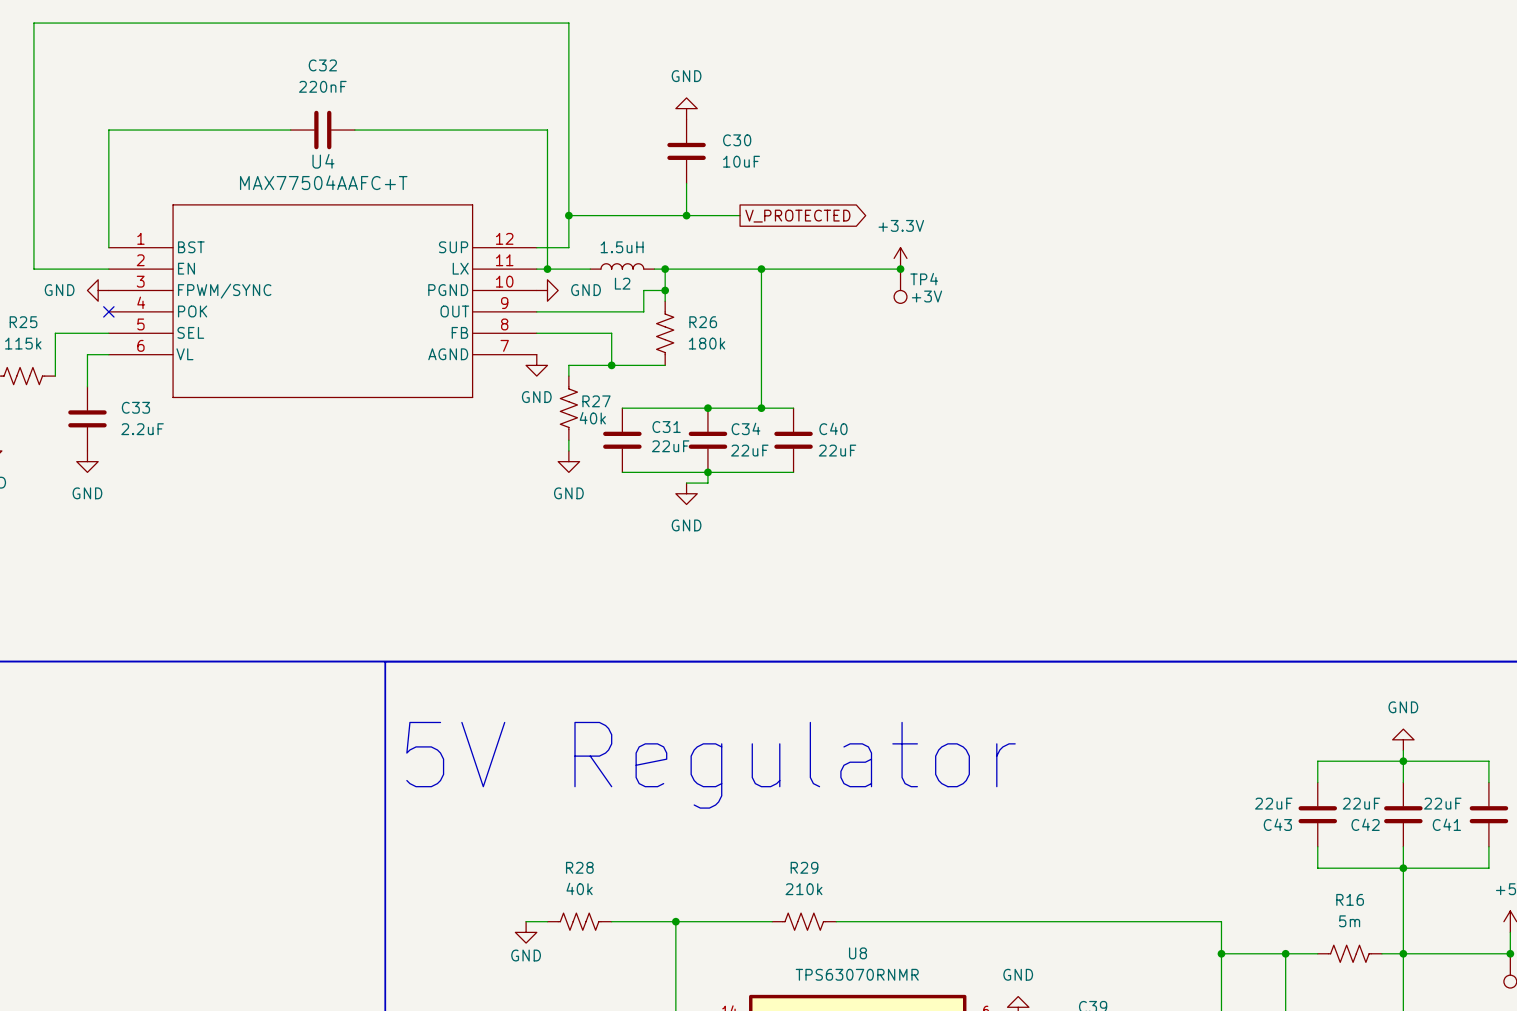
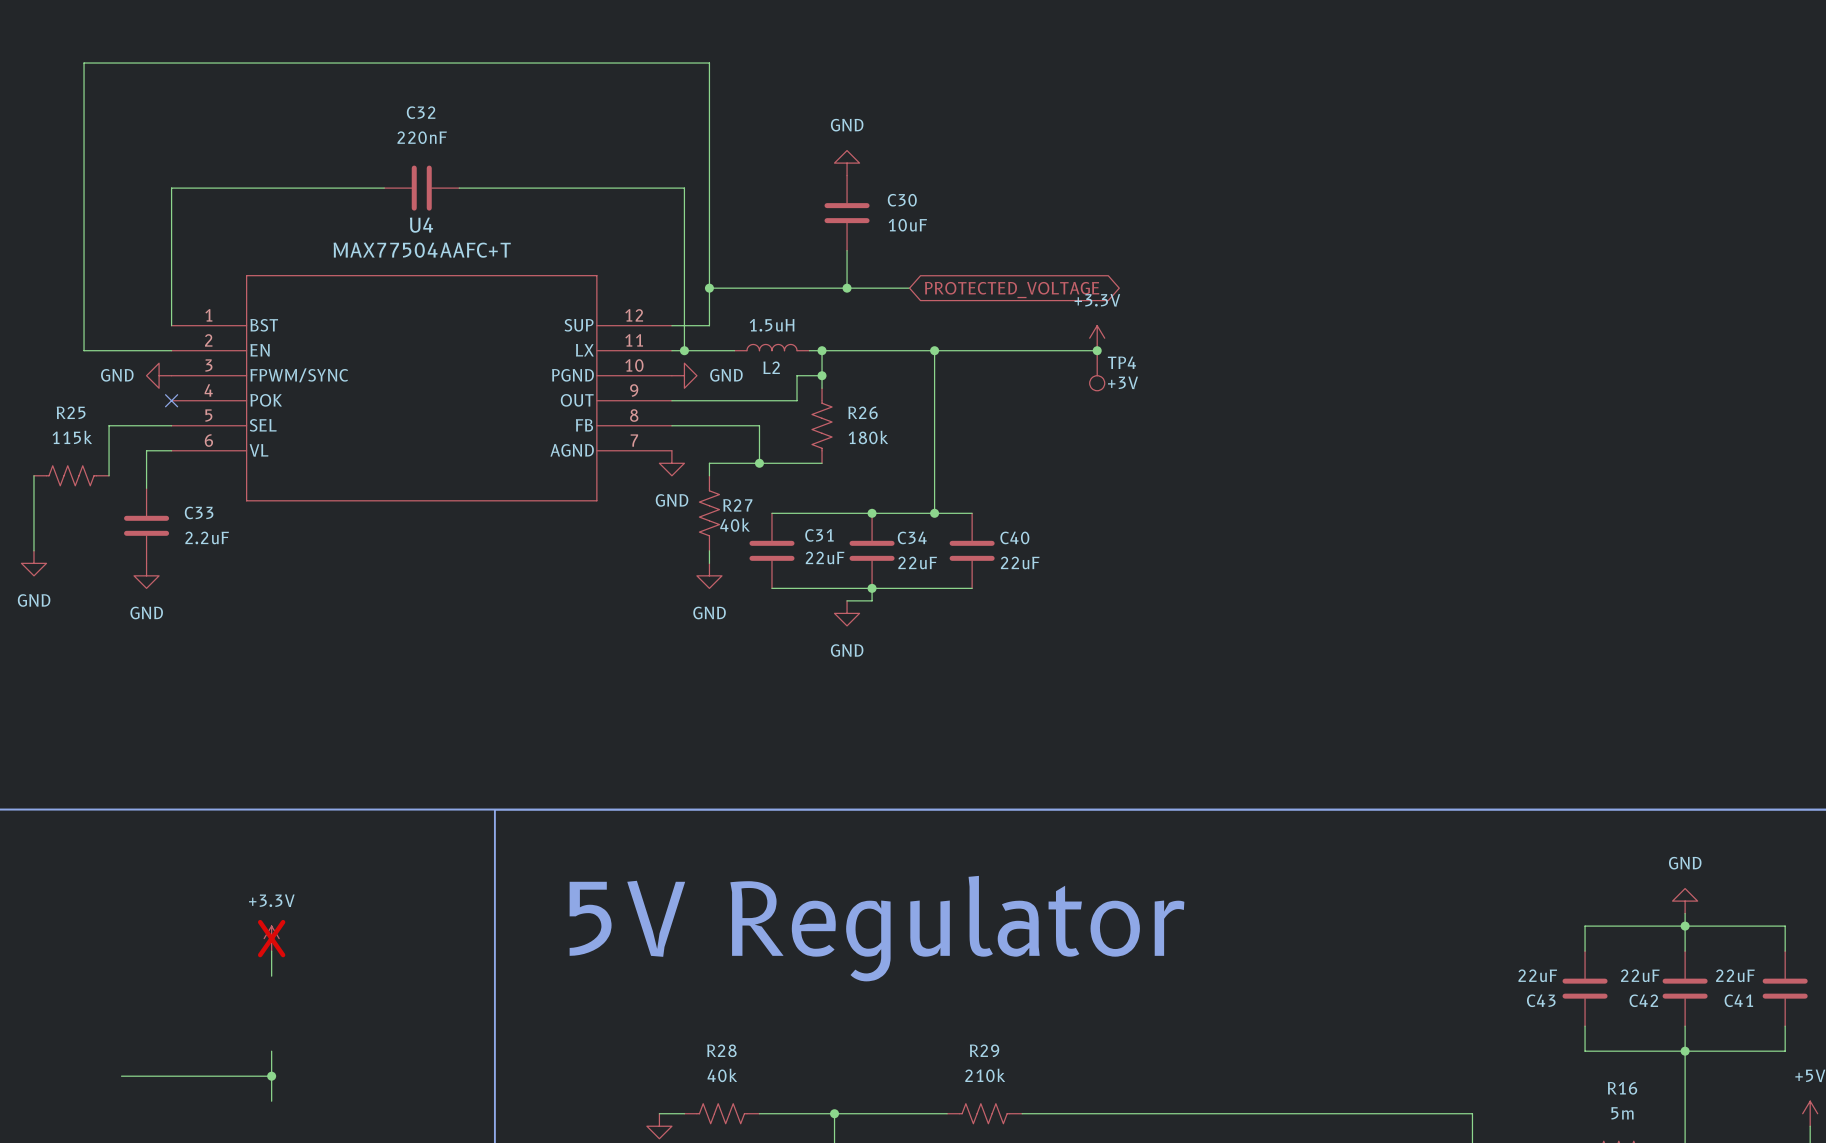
global label shape: output (797, 216) -> bidirectional (1012, 290)
global label: V_PROTECTED (797, 216) -> PROTECTED_VOLTAGE (1012, 290)
power symbol: none -> +3.3V (271, 938)
wire: none -> (271, 951) (271, 976)
wire: none -> (271, 1051) (271, 1101)
wire: none -> (121, 1076) (271, 1076)
junction: none -> (271, 1076)

